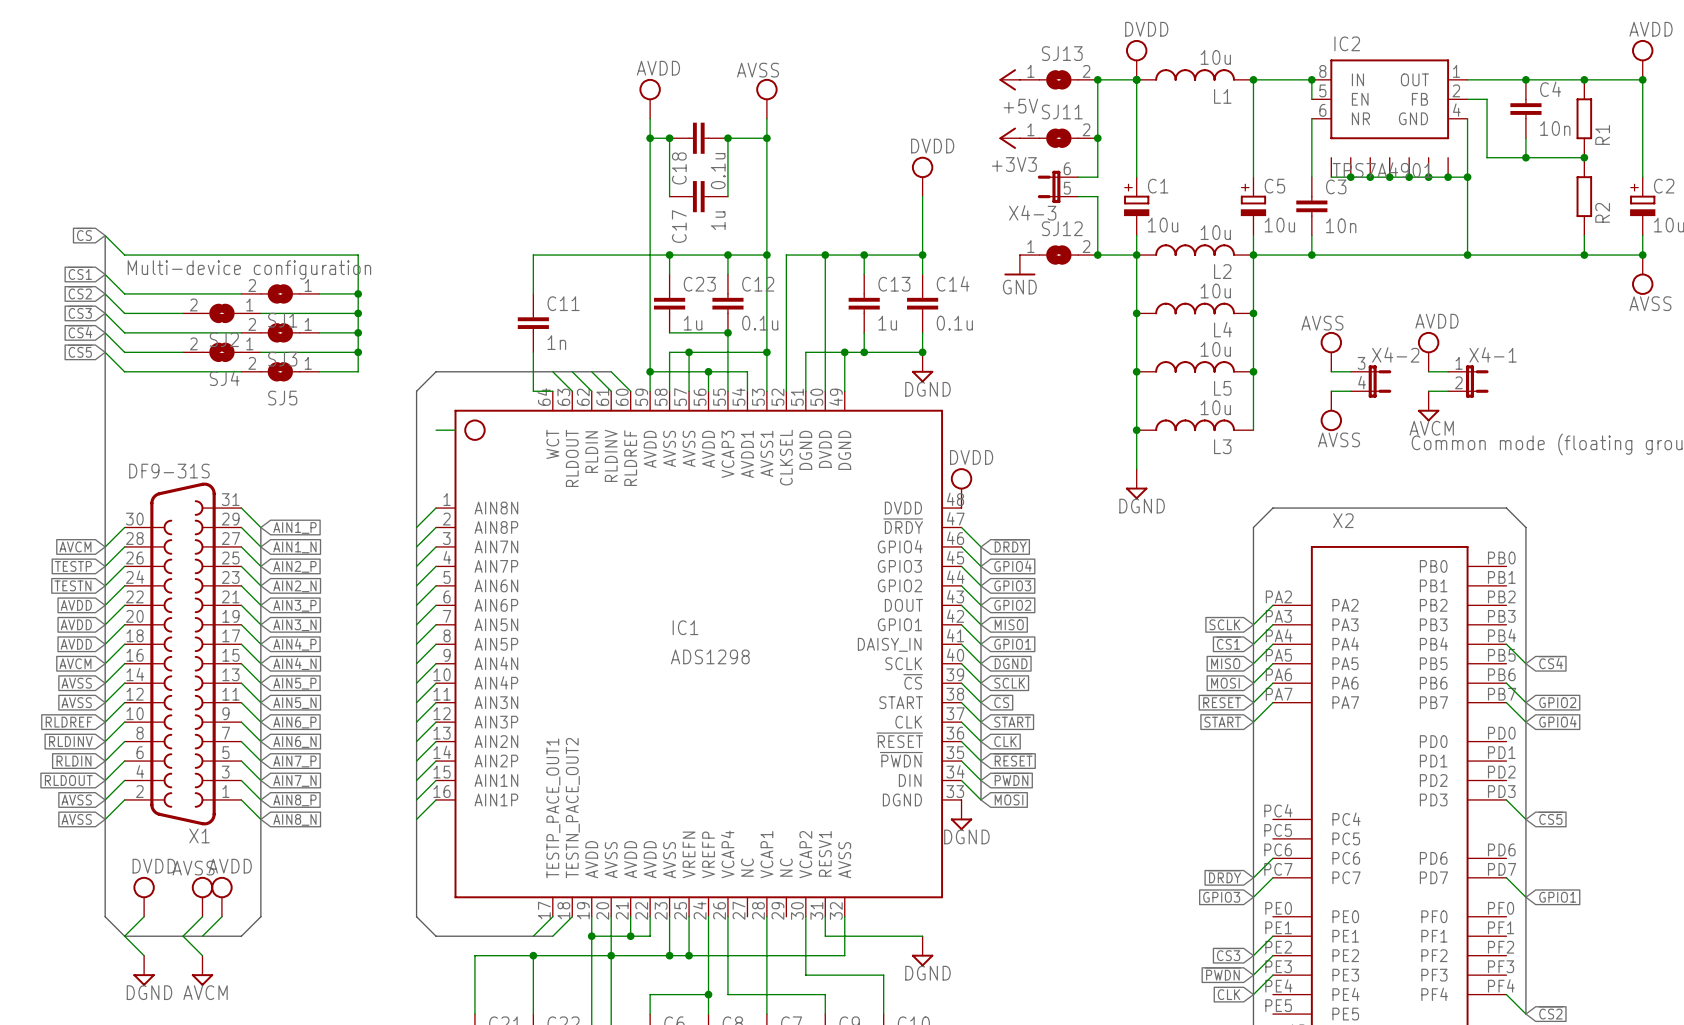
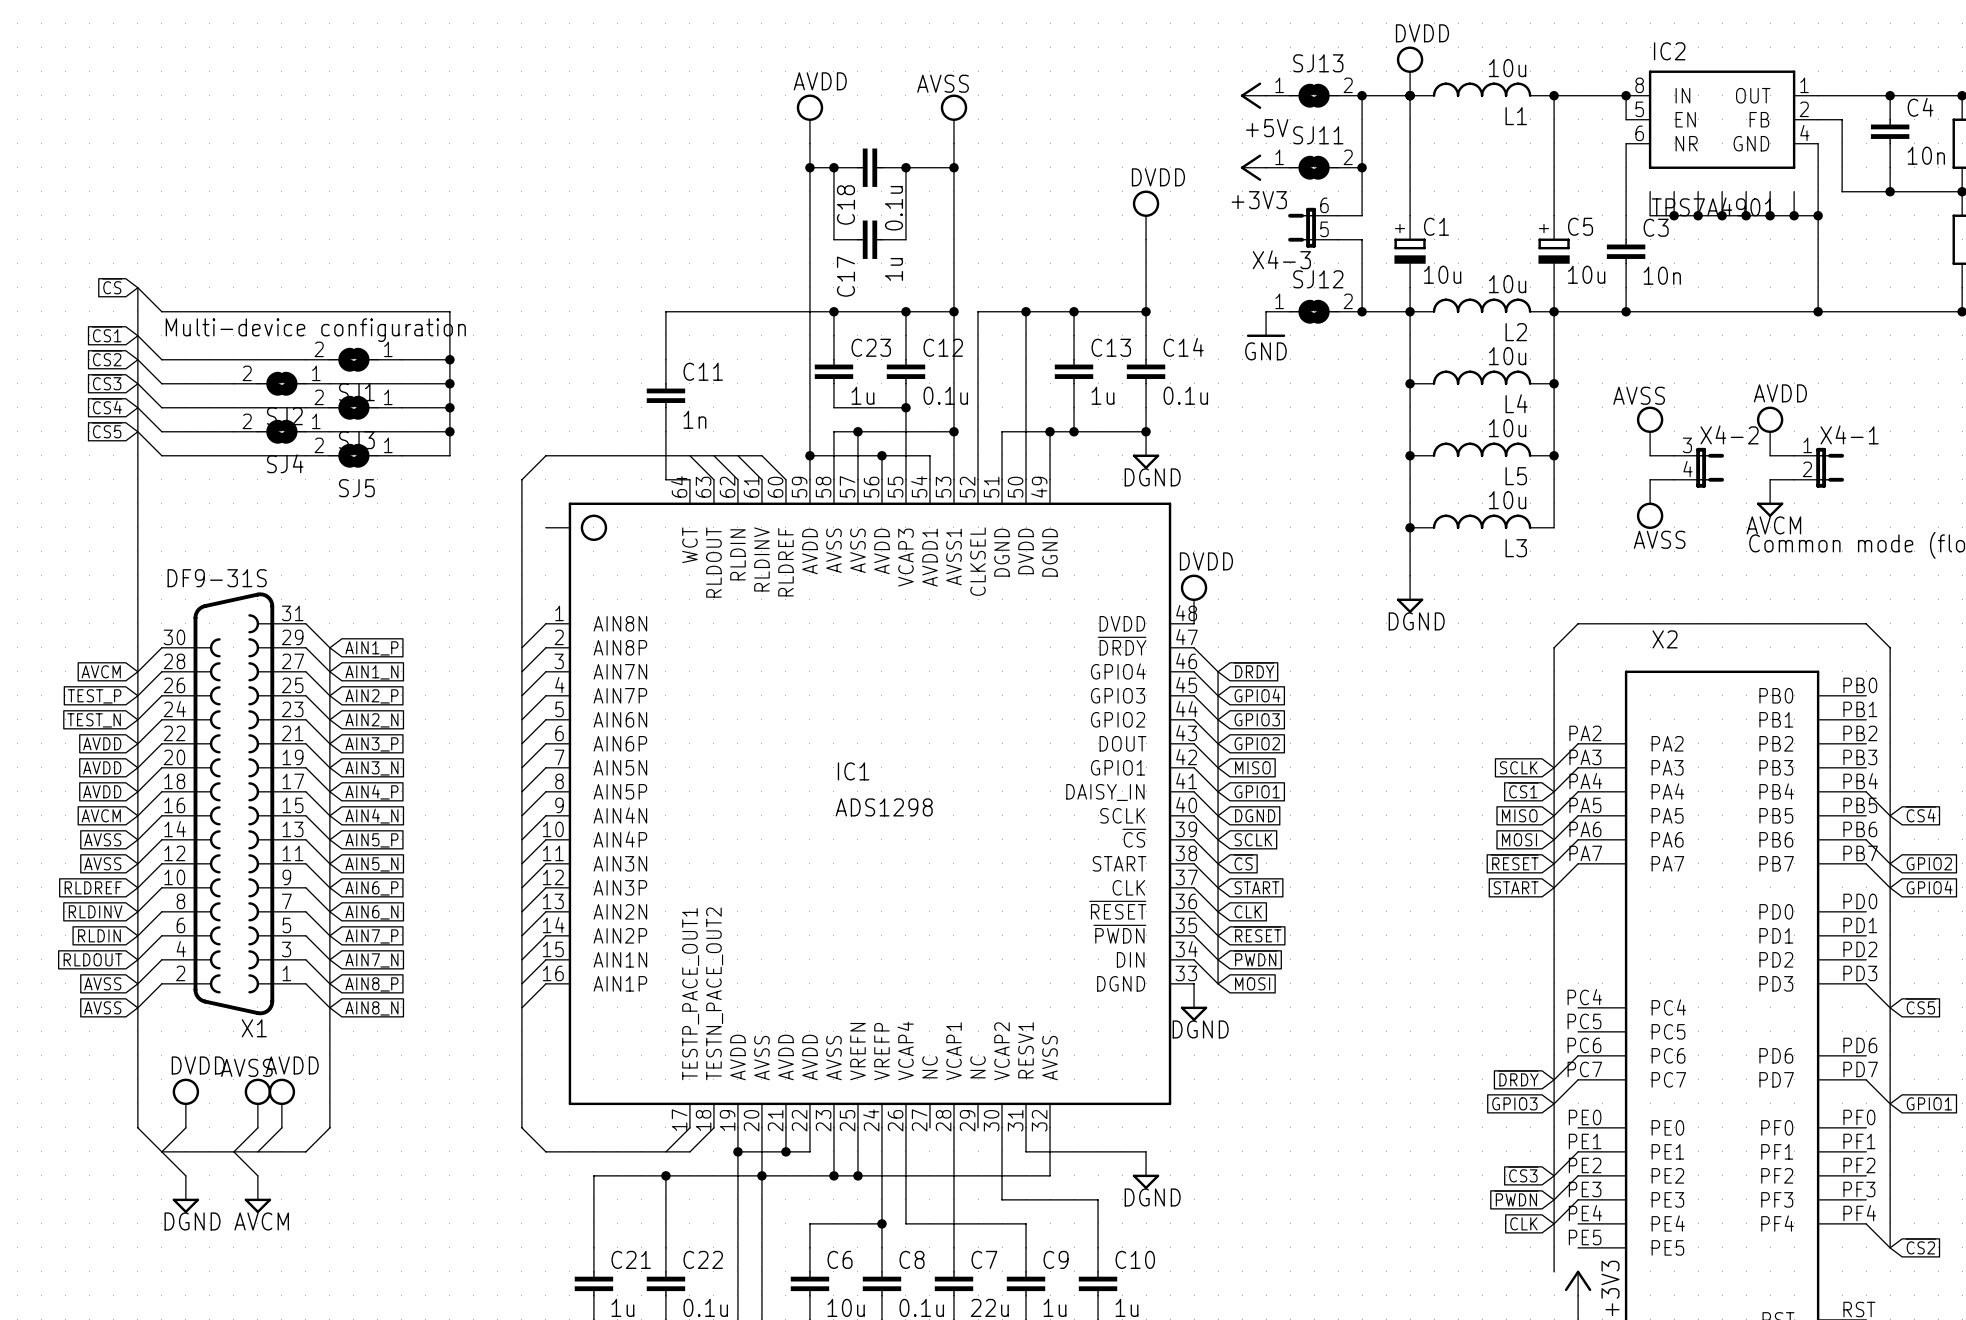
global label: TESTP (73, 566) -> TEST_P (94, 696)
global label: TESTN (72, 585) -> TEST_N (94, 720)

